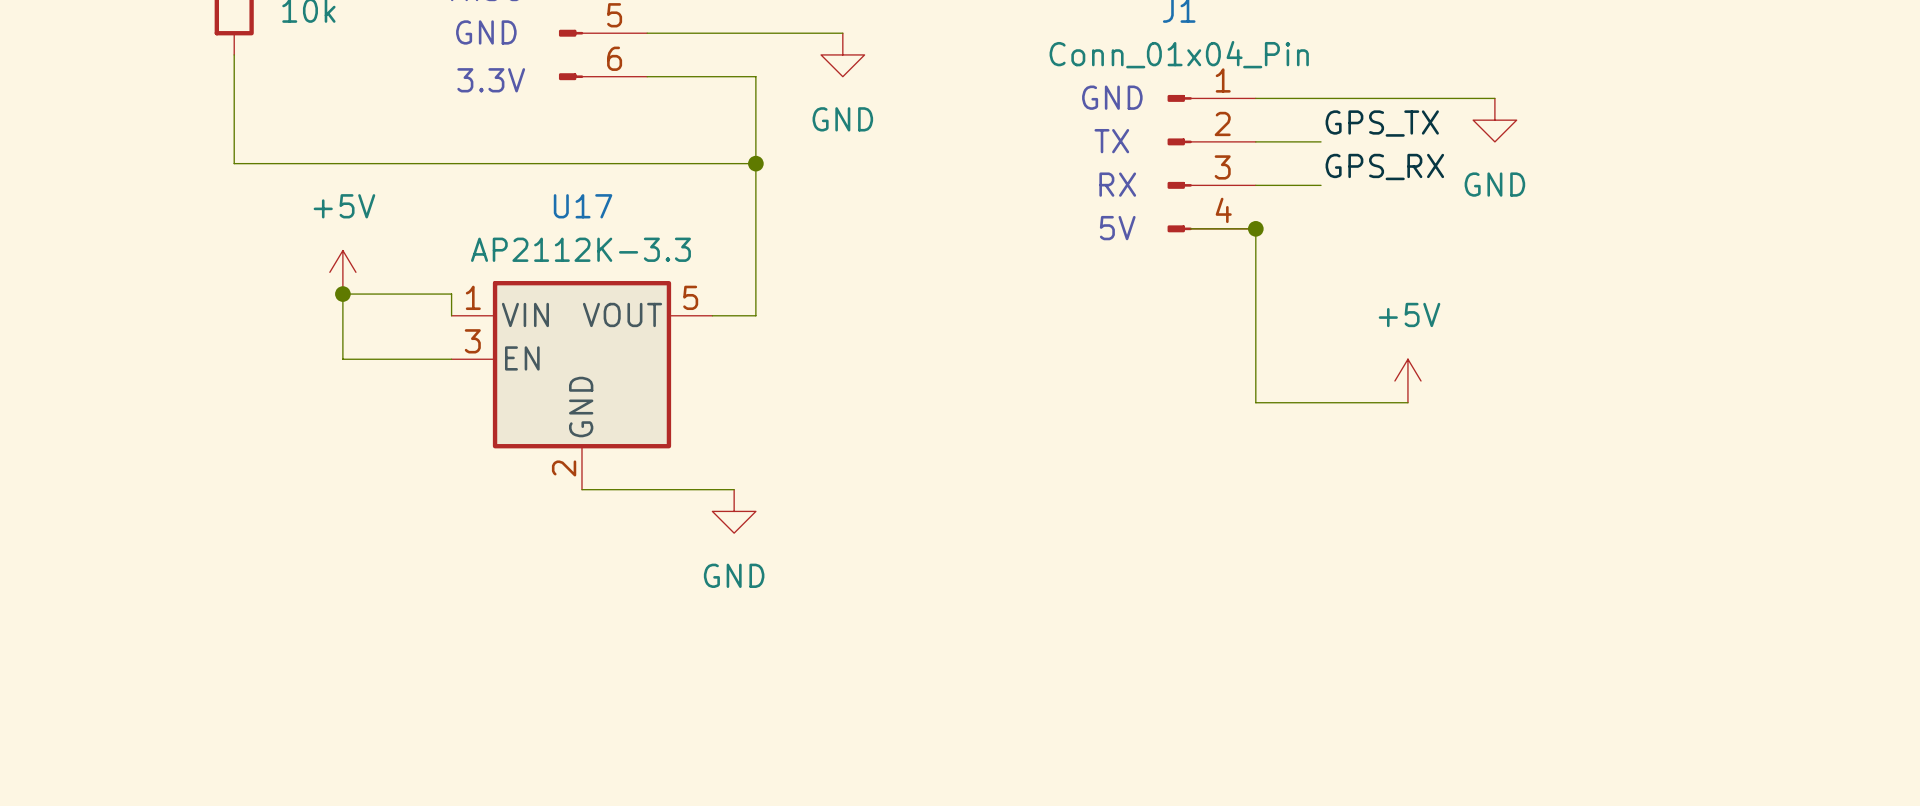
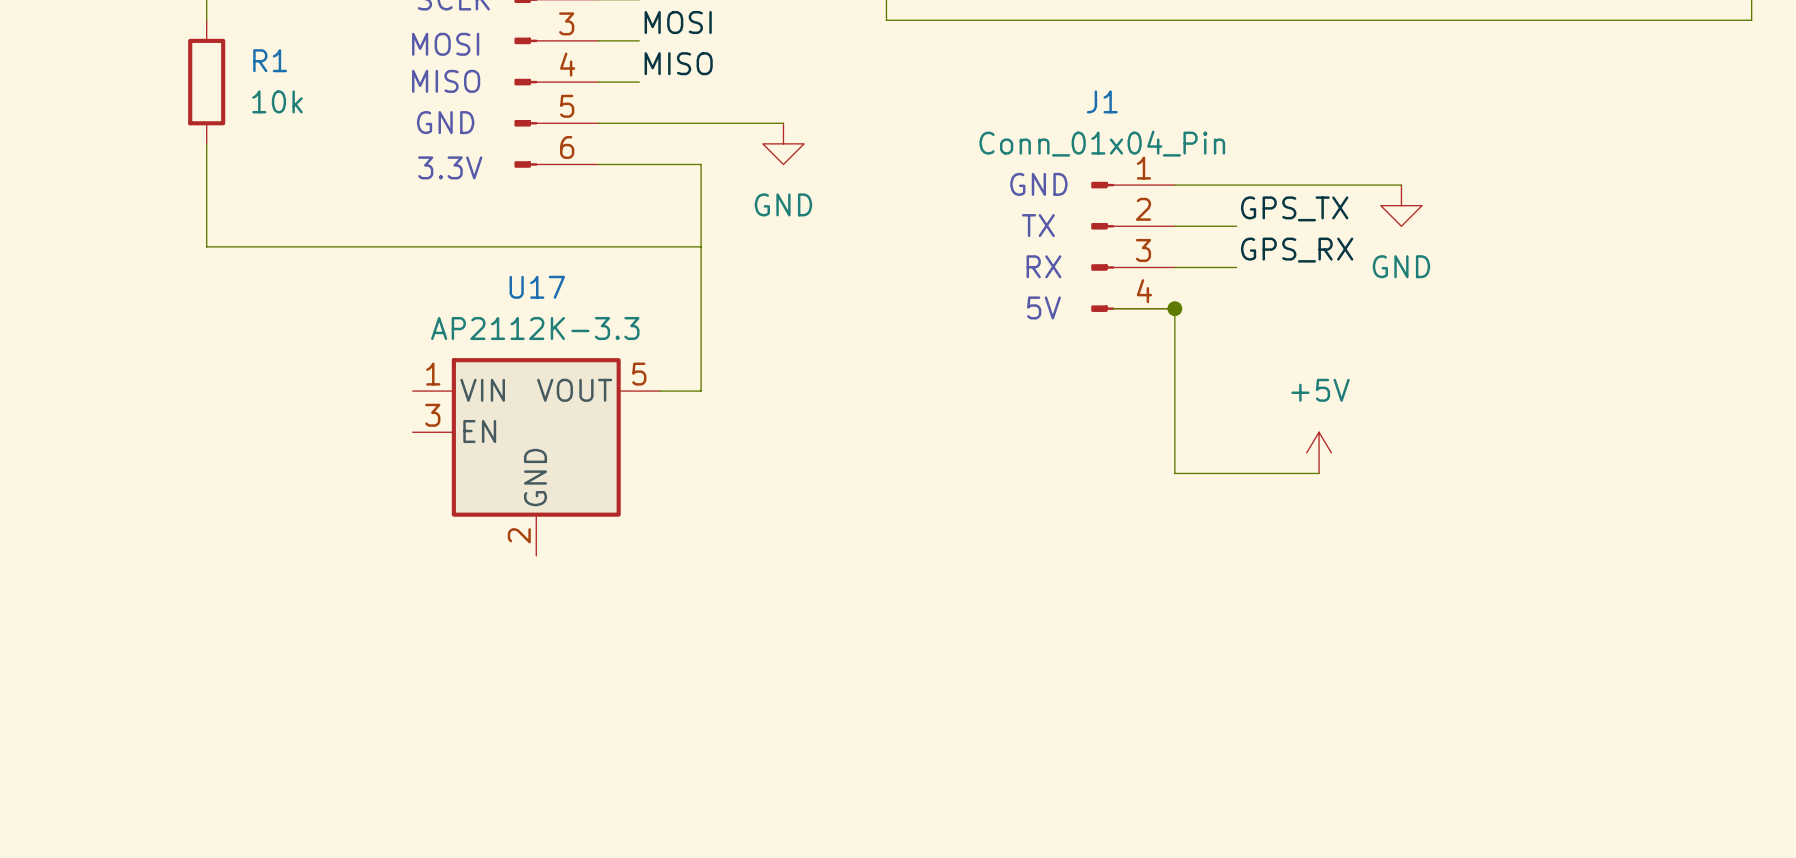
junction: (755, 163) -> none
power symbol: +5V (342, 272) -> none
junction: (342, 294) -> none
wire: (451, 315) (451, 294) (342, 294) (342, 359) (451, 359) -> none
wire: (581, 489) (734, 489) -> none
power symbol: GND (734, 511) -> none

